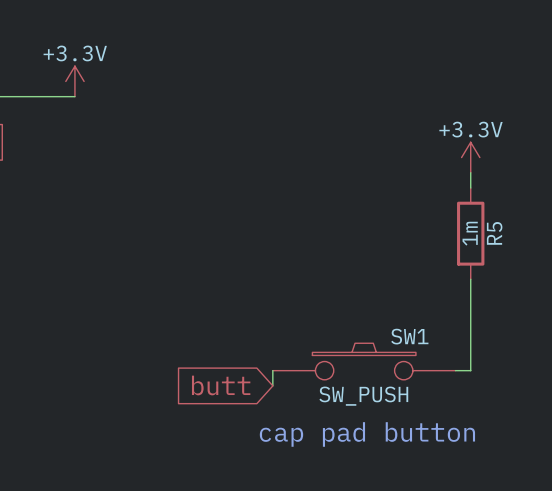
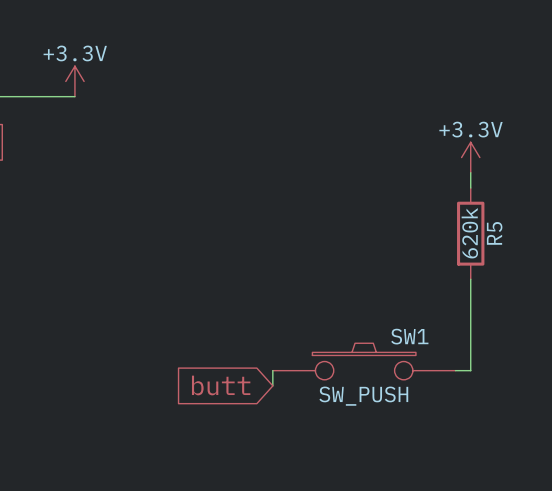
R5 value: 1m (470, 233) -> 620k (469, 233)
text: cap pad button (367, 434) -> none

